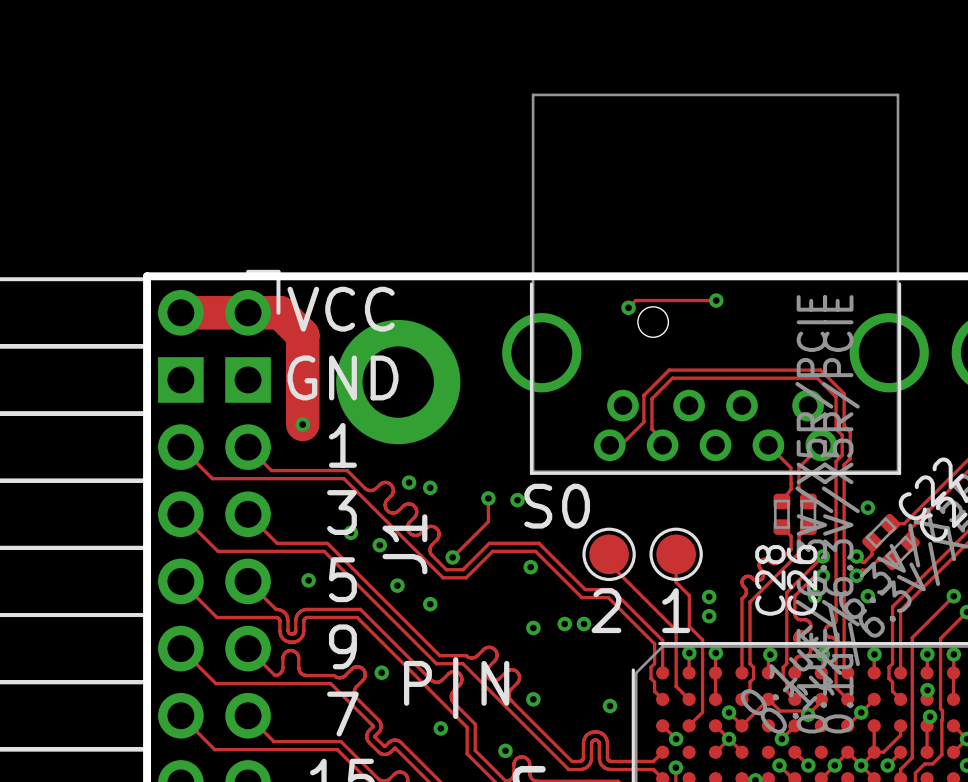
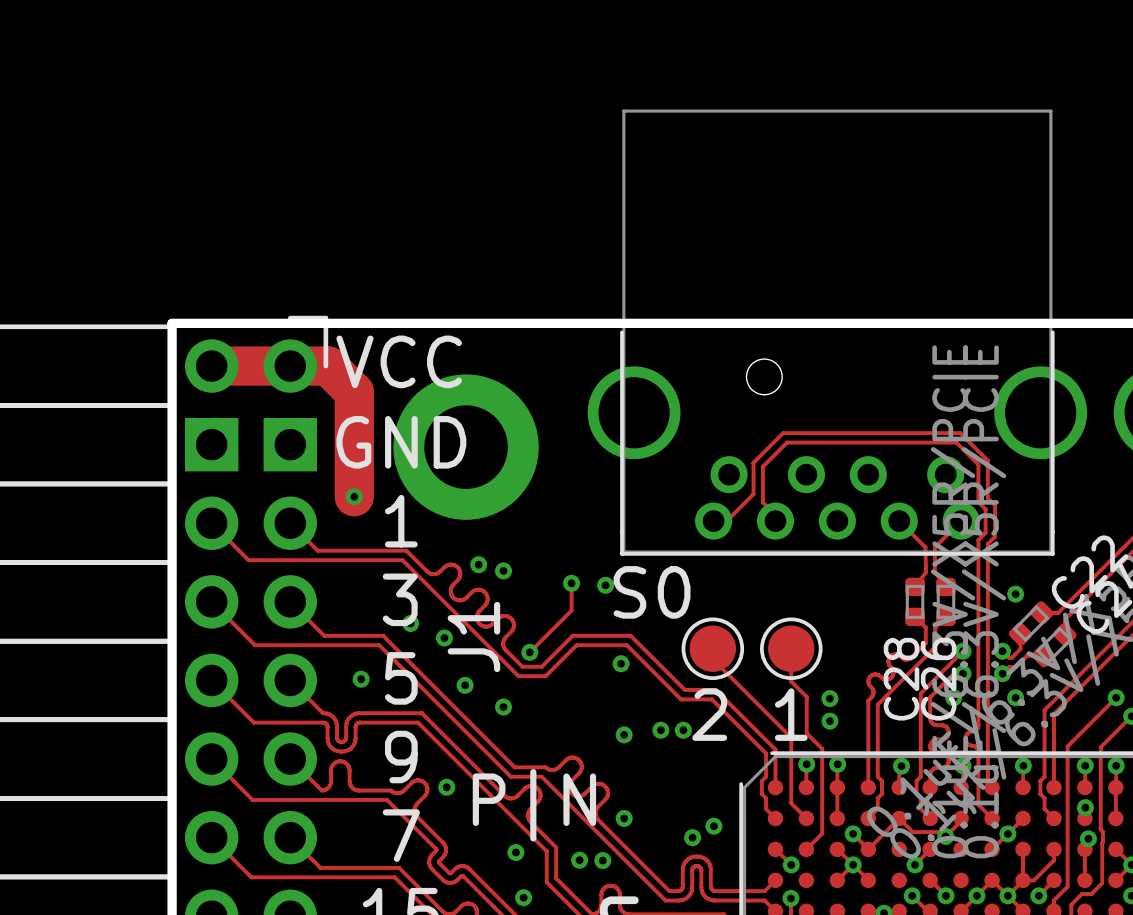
track: (716, 300) (635, 300) (628, 307) -> none
via: (716, 300) -> none
via: (628, 307) -> none
via: none -> (692, 837)
via: none -> (579, 860)
via: none -> (602, 860)
via: (505, 750) -> none
via: none -> (523, 897)

